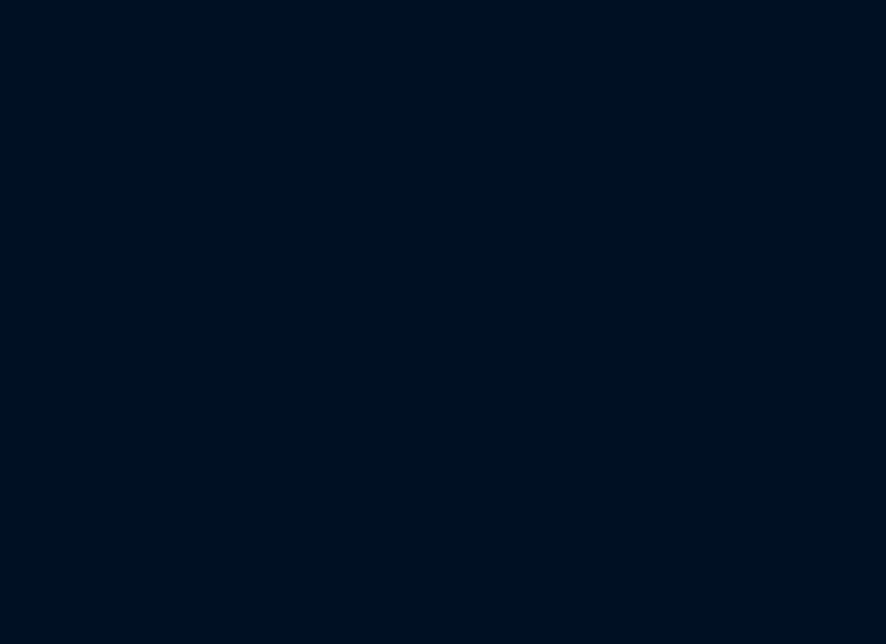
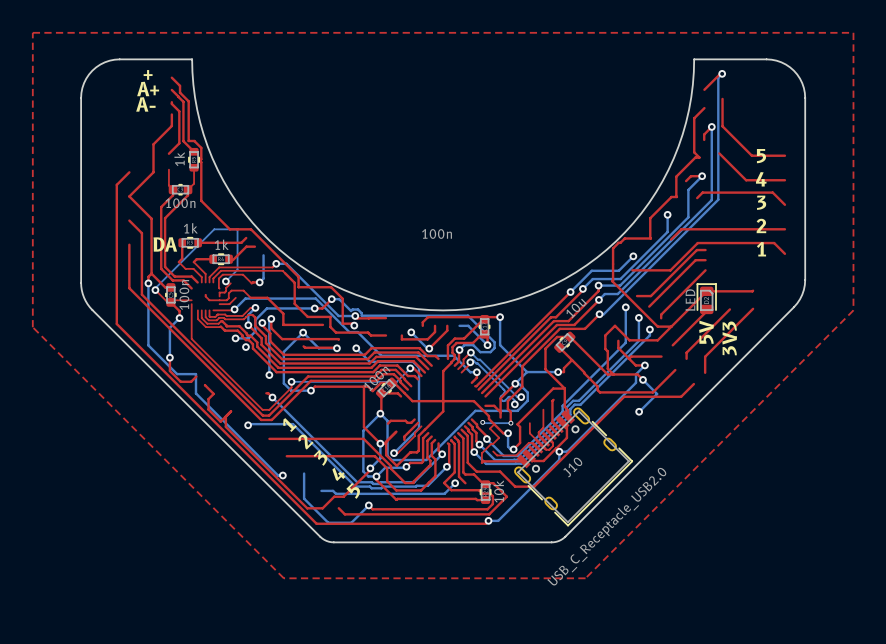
top zone outline: none -> (32, 32) (853, 32) (853, 310) (585, 578) (283, 578) (32, 327) (32, 32)
board edge: none -> (119, 59) (192, 59) (197, 109) (207, 146) (217, 169) (230, 192) (252, 222) (289, 257) (321, 278) (368, 298) (405, 307) (443, 310) (493, 305) (542, 290) (586, 265) (616, 241) (649, 202) (673, 158) (689, 109) (694, 59) (766, 59) (781, 62) (797, 74) (804, 92) (805, 279) (802, 294) (793, 307) (560, 540) (551, 542) (326, 540) (92, 310) (84, 297) (81, 282) (81, 92) (86, 78) (92, 70) (104, 62) (119, 59)
top track: none -> (722, 73) (704, 89)
bottom track: none -> (722, 73) (718, 77) (718, 199) (603, 314) (599, 314)
via: none -> (722, 73)
text: none -> + (148, 74)
top track: none -> (171, 77) (180, 85) (180, 92) (188, 101) (188, 140) (194, 140) (201, 147) (201, 200) (229, 229) (251, 229) (298, 276) (298, 287) (331, 287) (342, 298) (342, 323) (352, 323) (354, 325)
text: none -> A+ (148, 88)
top track: none -> (171, 89) (183, 101) (183, 141) (194, 151)
top track: none -> (722, 98) (722, 126) (751, 155) (784, 155)
top track: none -> (171, 102) (179, 111) (179, 143) (168, 153)
text: none -> A- (145, 104)
top track: none -> (704, 108) (694, 118) (694, 152) (699, 157) (695, 157) (676, 176) (676, 196) (671, 196) (650, 218) (650, 238) (624, 238) (613, 248) (612, 281) (657, 326) (671, 326)
top track: none -> (171, 114) (171, 125) (153, 144) (153, 172) (129, 196) (151, 218) (151, 273)
top track: none -> (711, 126) (704, 134) (704, 139)
bottom track: none -> (711, 126) (711, 200) (617, 294) (604, 294) (598, 299)
via: none -> (711, 126)
top track: none -> (719, 153) (746, 180) (784, 180)
text: none -> 5 (761, 156)
part: none -> 1k (194, 159)
top track: none -> (194, 167) (194, 183) (188, 189) (188, 195) (165, 218) (165, 266) (174, 276) (191, 276) (197, 282)
top track: none -> (168, 169) (168, 185) (173, 189) (173, 195) (161, 207) (161, 268) (172, 280) (183, 280) (191, 288)
top track: none -> (129, 172) (116, 184) (116, 323) (316, 523) (485, 523) (488, 520)
top track: none -> (702, 176) (691, 176) (686, 181)
bottom track: none -> (702, 176) (688, 189) (688, 217) (620, 285) (598, 285)
via: none -> (702, 176)
text: none -> 4 (761, 179)
part: none -> 100n (180, 189)
top track: none -> (697, 198) (702, 192) (772, 192) (784, 204)
text: none -> 3 (761, 202)
bottom track: none -> (667, 214) (667, 231) (620, 279) (592, 279) (582, 288)
via: none -> (667, 214)
top track: none -> (129, 220) (141, 233) (141, 294) (262, 415) (269, 415) (308, 376) (375, 376) (381, 369) (395, 369) (411, 386)
text: none -> 2 (761, 225)
top track: none -> (784, 229) (681, 229) (671, 239)
top track: none -> (246, 238) (241, 242) (198, 242)
top track: none -> (182, 242) (182, 258) (178, 262) (185, 268) (193, 268) (201, 277) (201, 282)
part: none -> 1k (190, 242)
top track: none -> (129, 244) (129, 288) (261, 419) (271, 419) (310, 380) (376, 380) (383, 374) (393, 374) (407, 389)
text: none -> DA (165, 244)
top track: none -> (254, 246) (246, 246) (232, 260)
text: none -> 1 (761, 249)
top track: none -> (705, 250) (696, 250) (650, 296) (637, 296)
top track: none -> (784, 253) (774, 243) (697, 243) (670, 270) (632, 270)
bottom track: none -> (263, 255) (263, 278) (259, 282)
bottom track: none -> (633, 256) (618, 270) (591, 270) (570, 292)
via: none -> (633, 256)
top track: none -> (213, 259) (196, 259) (193, 262) (205, 273) (205, 282)
part: none -> 1k (221, 259)
top track: none -> (705, 260) (695, 260) (649, 306)
top track: none -> (276, 263) (272, 267) (219, 267) (209, 277) (209, 282)
bottom track: none -> (276, 263) (286, 263) (338, 316) (355, 316)
via: none -> (276, 263)
top track: none -> (705, 270) (661, 314) (661, 318)
top track: none -> (151, 273) (148, 276) (148, 283)
top track: none -> (151, 273) (165, 287) (170, 287)
bottom track: none -> (225, 281) (237, 269) (237, 229) (214, 229) (155, 290)
via: none -> (225, 281)
top track: none -> (213, 282) (213, 278) (221, 270) (282, 270) (294, 282) (294, 303) (307, 316) (330, 316) (330, 327) (336, 332) (368, 332) (370, 335) (385, 335)
top track: none -> (259, 282) (251, 283) (243, 274) (222, 274) (218, 278) (219, 288)
via: none -> (259, 282)
bottom track: none -> (148, 283) (148, 345) (177, 374) (195, 374) (195, 393) (278, 475) (282, 475)
via: none -> (148, 283)
top track: none -> (230, 283) (224, 292) (219, 292) (219, 296)
top track: none -> (598, 285) (598, 291) (568, 321) (553, 321) (482, 393)
via: none -> (598, 285)
top track: none -> (582, 288) (555, 317) (551, 317) (478, 389)
via: none -> (582, 288)
top track: none -> (155, 290) (167, 302) (170, 302)
via: none -> (155, 290)
top track: none -> (753, 290) (706, 291) (657, 340) (629, 340) (615, 325) (605, 335) (607, 368) (613, 374)
top track: none -> (570, 292) (475, 386)
via: none -> (570, 292)
part: none -> 100n (170, 294)
top track: none -> (205, 294) (209, 300) (226, 300) (231, 290) (243, 290) (250, 297) (267, 297) (283, 313) (283, 324) (322, 324)
top track: none -> (235, 297) (229, 304) (219, 304)
part: none -> LED (706, 298)
top track: none -> (331, 299) (322, 308) (314, 308)
bottom track: none -> (331, 299) (339, 299) (351, 311) (357, 309) (361, 315) (468, 315) (494, 342) (494, 348) (490, 352) (480, 352) (473, 345) (464, 345) (459, 349)
via: none -> (331, 299)
top track: none -> (598, 299) (574, 324) (556, 324) (485, 396)
via: none -> (598, 299)
top track: none -> (191, 300) (173, 300) (170, 302)
top track: none -> (170, 302) (179, 311) (179, 318)
top track: none -> (191, 304) (191, 338) (262, 409) (269, 409) (291, 387) (291, 381)
top track: none -> (255, 307) (250, 307) (242, 315) (217, 314) (215, 316) (210, 316) (209, 310)
bottom track: none -> (255, 307) (248, 314) (248, 325)
via: none -> (255, 307)
bottom track: none -> (625, 307) (625, 342) (562, 405) (562, 411) (518, 455) (503, 455) (486, 439)
via: none -> (625, 307)
bottom track: none -> (314, 308) (266, 308) (255, 320) (255, 331) (248, 338) (235, 338)
via: none -> (314, 308)
top track: none -> (753, 308) (705, 356) (705, 372)
top track: none -> (234, 309) (213, 310)
bottom track: none -> (234, 309) (245, 298) (315, 298) (349, 332) (357, 332) (381, 355) (453, 355) (470, 372) (476, 372)
via: none -> (234, 309)
top track: none -> (706, 309) (672, 345)
top track: none -> (729, 309) (686, 352) (686, 358)
top track: none -> (197, 310) (197, 319) (205, 327) (220, 326) (224, 330) (237, 330) (245, 340) (252, 344) (252, 348) (276, 372) (373, 372) (379, 365) (397, 365) (408, 376) (414, 376) (418, 379)
top track: none -> (201, 310) (201, 318) (207, 323) (218, 323) (222, 321) (226, 326) (239, 326) (257, 342) (257, 346) (278, 367) (371, 367) (378, 361) (413, 361) (424, 372)
top track: none -> (205, 310) (205, 317) (208, 320) (216, 320) (219, 317) (243, 319) (248, 315) (252, 315) (255, 317) (255, 325) (265, 336) (265, 343) (282, 359) (367, 359) (374, 352) (418, 352) (431, 365)
top track: none -> (599, 314) (584, 328) (559, 328) (522, 366) (522, 386) (507, 401) (510, 423)
via: none -> (599, 314)
top track: none -> (355, 316) (357, 318) (385, 318)
via: none -> (355, 316)
top track: none -> (483, 317) (427, 317) (422, 322) (422, 325)
top track: none -> (483, 317) (464, 338) (454, 338) (447, 345) (447, 358)
top track: none -> (500, 317) (483, 317)
bottom track: none -> (500, 317) (500, 345) (527, 372)
via: none -> (500, 317)
bottom track: none -> (638, 317) (638, 340) (578, 400) (573, 400) (566, 407) (566, 413) (519, 459) (494, 460) (479, 444)
via: none -> (638, 317)
bottom track: none -> (179, 318) (169, 327) (169, 357)
via: none -> (179, 318)
top track: none -> (271, 318) (271, 328) (282, 339) (338, 339)
bottom track: none -> (271, 318) (269, 320) (269, 375)
via: none -> (271, 318)
top track: none -> (262, 322) (262, 325) (270, 333) (270, 341) (283, 354) (364, 354) (371, 348) (419, 348) (427, 356) (435, 356) (438, 358)
via: none -> (262, 322)
top track: none -> (248, 325) (261, 338) (261, 344) (280, 363) (369, 363) (376, 356) (416, 356) (428, 369)
via: none -> (248, 325)
via: none -> (354, 325)
top track: none -> (435, 325) (435, 332) (427, 339) (401, 339) (401, 335)
top track: none -> (447, 325) (447, 330) (429, 348)
bottom track: none -> (459, 325) (468, 325) (487, 345)
part: none -> 100n (484, 326)
bottom track: none -> (649, 329) (649, 335) (580, 404) (574, 404) (570, 409) (570, 414) (521, 463) (486, 463) (474, 452)
via: none -> (649, 329)
text: none -> 5V (706, 332)
via: none -> (303, 332)
bottom track: none -> (411, 332) (429, 348)
via: none -> (411, 332)
text: none -> 3V3 (729, 338)
via: none -> (235, 338)
top track: none -> (618, 340) (618, 348) (635, 365) (644, 365)
part: none -> 10u (564, 342)
top track: none -> (487, 345) (487, 336) (483, 332) (473, 342) (456, 342) (452, 347) (454, 358) (443, 371) (443, 411) (418, 435) (418, 450) (417, 452) (410, 452) (396, 465) (386, 455) (386, 441)
via: none -> (487, 345)
top track: none -> (303, 346) (336, 348)
via: none -> (245, 347)
top track: none -> (559, 347) (597, 386) (599, 392) (652, 392) (675, 370)
bottom track: none -> (336, 348) (318, 348) (303, 332) (283, 351) (283, 383) (291, 390) (311, 390)
via: none -> (336, 348)
bottom track: none -> (356, 348) (369, 361) (413, 361) (419, 367) (419, 428) (394, 453)
via: none -> (356, 348)
via: none -> (429, 348)
top track: none -> (459, 349) (459, 361) (454, 365)
via: none -> (459, 349)
top track: none -> (470, 352) (463, 359) (463, 363) (458, 369)
bottom track: none -> (470, 352) (517, 397) (521, 397)
via: none -> (470, 352)
top track: none -> (661, 356) (631, 356) (629, 358)
top track: none -> (169, 357) (169, 370) (180, 381) (191, 381) (196, 376)
via: none -> (169, 357)
top track: none -> (572, 360) (563, 368) (563, 372) (558, 372)
top track: none -> (470, 362) (461, 372)
bottom track: none -> (470, 362) (473, 360) (477, 363) (504, 390) (500, 397) (501, 400) (510, 396) (514, 400) (514, 404)
via: none -> (470, 362)
bottom track: none -> (644, 365) (636, 374) (636, 382) (567, 451) (559, 451) (559, 459) (498, 520) (488, 520)
via: none -> (644, 365)
top track: none -> (410, 368) (413, 368) (421, 375)
bottom track: none -> (410, 368) (396, 381) (291, 381)
via: none -> (410, 368)
top track: none -> (476, 372) (476, 377) (471, 382)
via: none -> (476, 372)
bottom track: none -> (527, 372) (558, 372)
bottom track: none -> (527, 372) (515, 383) (518, 383) (527, 392) (527, 400) (517, 410) (475, 410) (426, 460) (391, 460) (387, 455) (387, 420) (380, 413) (363, 430) (363, 471) (368, 476) (376, 476) (385, 467) (406, 466)
via: none -> (558, 372)
via: none -> (269, 375)
top track: none -> (643, 379) (637, 374) (607, 374) (570, 336) (557, 336) (545, 348) (545, 369) (564, 388)
bottom track: none -> (643, 379) (657, 394) (639, 411)
via: none -> (643, 379)
via: none -> (291, 381)
top track: none -> (515, 383) (500, 398) (500, 417)
via: none -> (515, 383)
top track: none -> (693, 384) (681, 396) (624, 396) (534, 486) (515, 486) (500, 471) (476, 471) (467, 462) (467, 435) (461, 429)
top track: none -> (205, 385) (213, 393) (208, 399) (208, 409) (220, 421) (231, 411)
top track: none -> (363, 386) (363, 427) (380, 443) (384, 443) (396, 431)
part: none -> 100n (386, 388)
top track: none -> (564, 388) (553, 388) (517, 424) (520, 426) (520, 442) (513, 449)
top track: none -> (564, 388) (564, 406) (568, 410) (568, 417)
top track: none -> (311, 390) (315, 386) (368, 386) (372, 391) (381, 382) (394, 382) (412, 401) (473, 401) (503, 433) (508, 433)
via: none -> (311, 390)
top track: none -> (266, 393) (272, 397)
top track: none -> (401, 396) (397, 393) (381, 393) (380, 413)
bottom track: none -> (272, 397) (357, 482) (371, 482) (373, 483) (414, 482) (442, 454)
via: none -> (272, 397)
via: none -> (521, 397)
top track: none -> (553, 399) (552, 421) (557, 427)
via: none -> (514, 404)
top track: none -> (485, 405) (494, 405) (500, 412)
top track: none -> (543, 409) (543, 427) (538, 432) (538, 435) (544, 440)
via: none -> (639, 411)
via: none -> (380, 413)
top track: none -> (225, 416) (225, 426) (307, 508) (322, 508) (334, 496) (343, 496) (370, 468)
top track: none -> (414, 419) (411, 422) (390, 420) (388, 423)
top track: none -> (471, 419) (486, 436) (486, 439)
top track: none -> (418, 422) (404, 436) (404, 440)
top track: none -> (468, 422) (476, 432) (476, 441) (479, 444)
bottom track: none -> (482, 422) (510, 423)
via: none -> (482, 422)
top track: none -> (562, 422) (566, 426) (566, 437) (556, 448)
via: none -> (510, 423)
top track: none -> (529, 423) (529, 433) (546, 449) (549, 449) (553, 442) (547, 437)
top track: none -> (494, 424) (489, 428) (499, 437) (481, 453) (481, 462) (523, 461)
bottom track: none -> (248, 425) (292, 424) (355, 486) (381, 488) (383, 486) (427, 485) (446, 466)
via: none -> (248, 425)
text: none -> 1 (290, 425)
top track: none -> (421, 426) (397, 453) (394, 453)
top track: none -> (465, 426) (472, 434) (472, 449) (474, 452)
top track: none -> (428, 433) (423, 438) (423, 461) (410, 462) (406, 466)
top track: none -> (458, 433) (463, 438) (463, 472) (465, 474) (474, 474) (482, 483) (493, 483) (506, 496) (489, 514) (344, 514) (338, 508)
bottom track: none -> (508, 433) (508, 446) (513, 449)
via: none -> (508, 433)
top track: none -> (431, 436) (427, 440) (427, 457) (430, 460) (430, 466) (413, 482) (405, 482) (363, 438) (269, 438)
top track: none -> (454, 436) (459, 442) (459, 476) (465, 483)
top track: none -> (435, 439) (431, 443) (431, 455) (435, 459) (435, 476) (421, 490) (396, 490) (387, 481) (387, 468) (374, 456) (286, 456)
top track: none -> (451, 439) (454, 443) (454, 472) (444, 482) (451, 490) (479, 490) (482, 493) (490, 493) (492, 496) (492, 503) (487, 509) (372, 509) (368, 505)
via: none -> (486, 439)
text: none -> 2 (305, 442)
bottom track: none -> (380, 443) (380, 458) (370, 468)
via: none -> (380, 443)
top track: none -> (438, 443) (438, 450) (442, 454)
top track: none -> (447, 443) (449, 464) (446, 466)
via: none -> (479, 444)
top track: none -> (537, 447) (532, 442) (528, 442) (516, 455) (497, 455) (493, 451)
top track: none -> (556, 448) (543, 461) (534, 461) (529, 455)
via: none -> (513, 449)
via: none -> (559, 451)
via: none -> (474, 452)
via: none -> (394, 453)
via: none -> (442, 454)
text: none -> 3 (320, 457)
via: none -> (406, 466)
via: none -> (446, 466)
J10: none -> USB_C_Receptacle_USB2.0 (573, 466)
via: none -> (370, 468)
bottom track: none -> (304, 473) (304, 498) (328, 522) (351, 522) (368, 505)
text: none -> 4 (338, 474)
via: none -> (282, 475)
top track: none -> (376, 476) (376, 479) (396, 499) (485, 500)
via: none -> (376, 476)
bottom track: none -> (455, 483) (444, 493) (336, 493) (333, 490) (321, 490)
via: none -> (455, 483)
text: none -> 5 (353, 490)
part: none -> 10k (485, 492)
via: none -> (368, 505)
via: none -> (488, 520)

